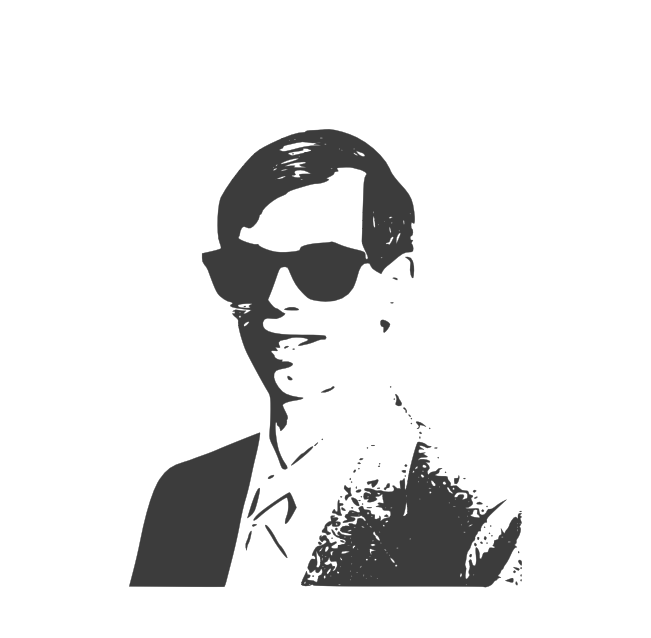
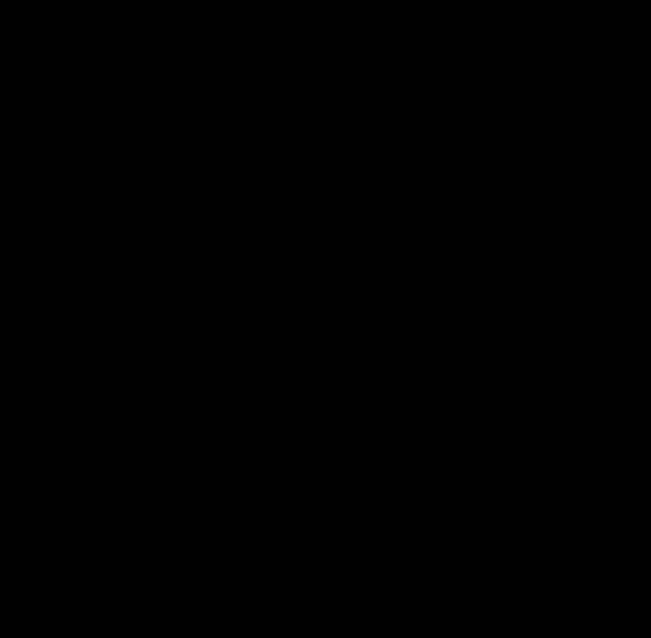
drawing: [129, 129, 522, 588] -> none

